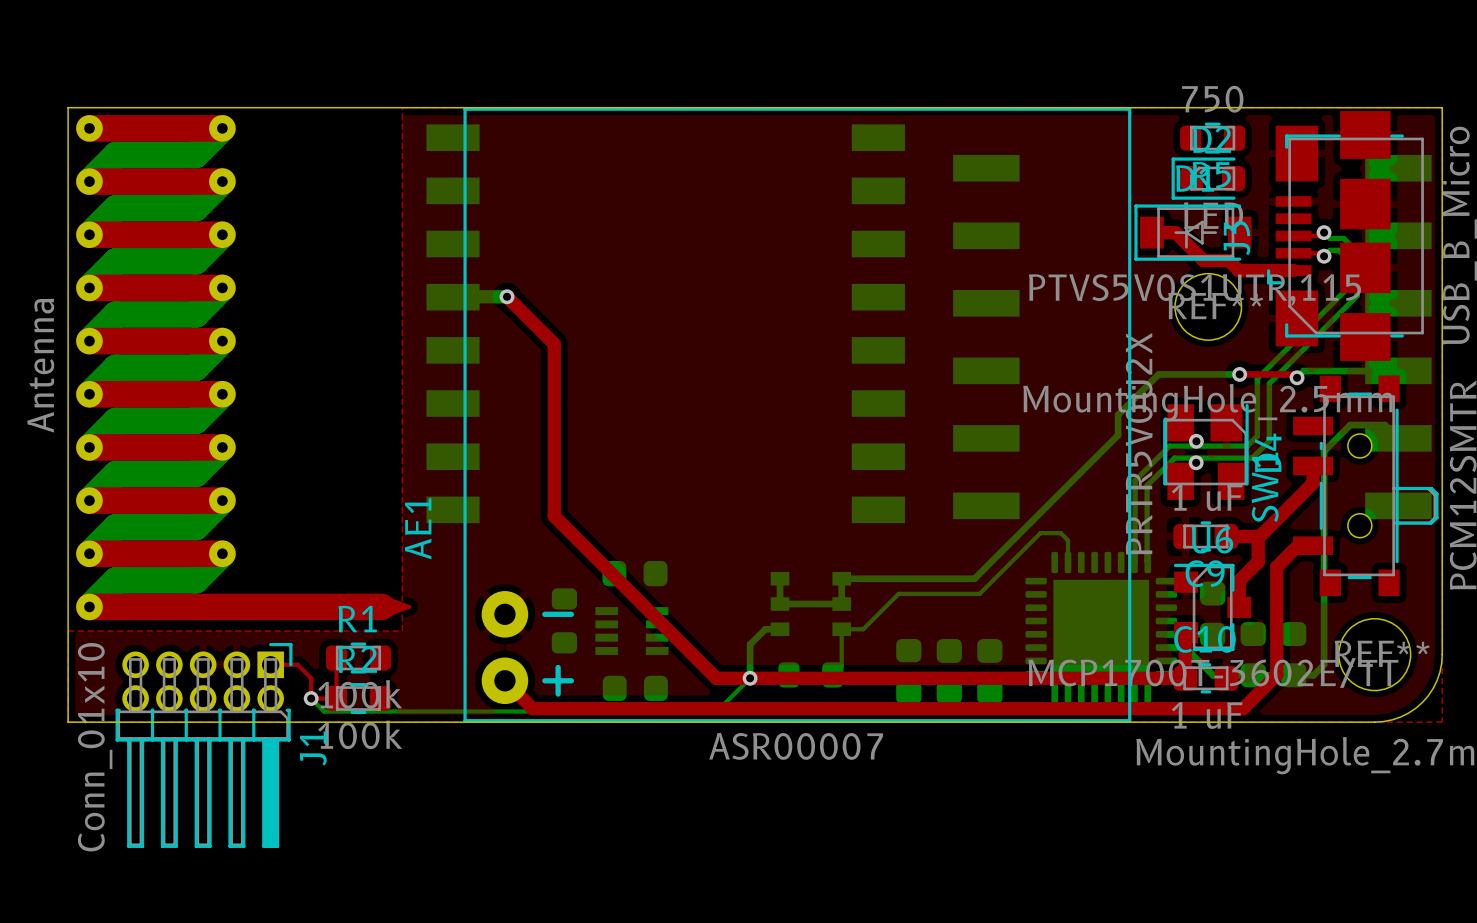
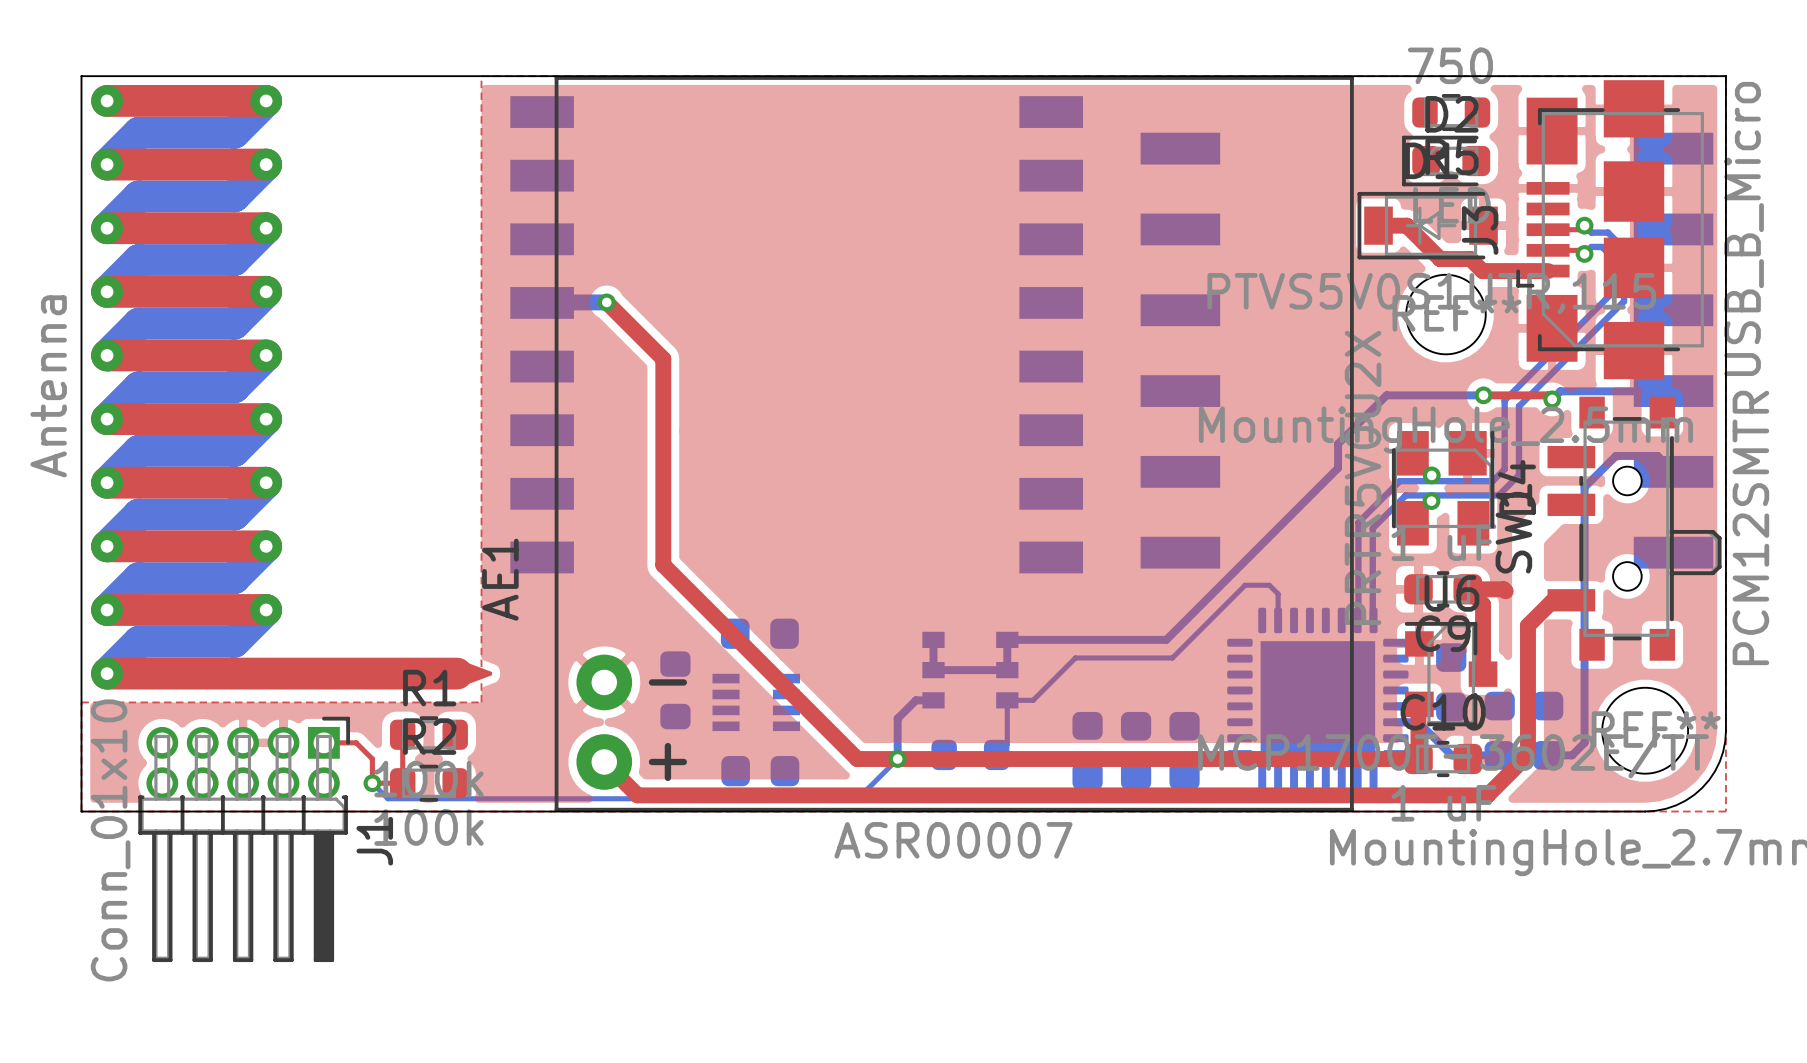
top track: (1313, 465) (1313, 483) (1258, 538) (1258, 561) (1239, 580) -> (1467, 589) (1483, 604) (1483, 642)

